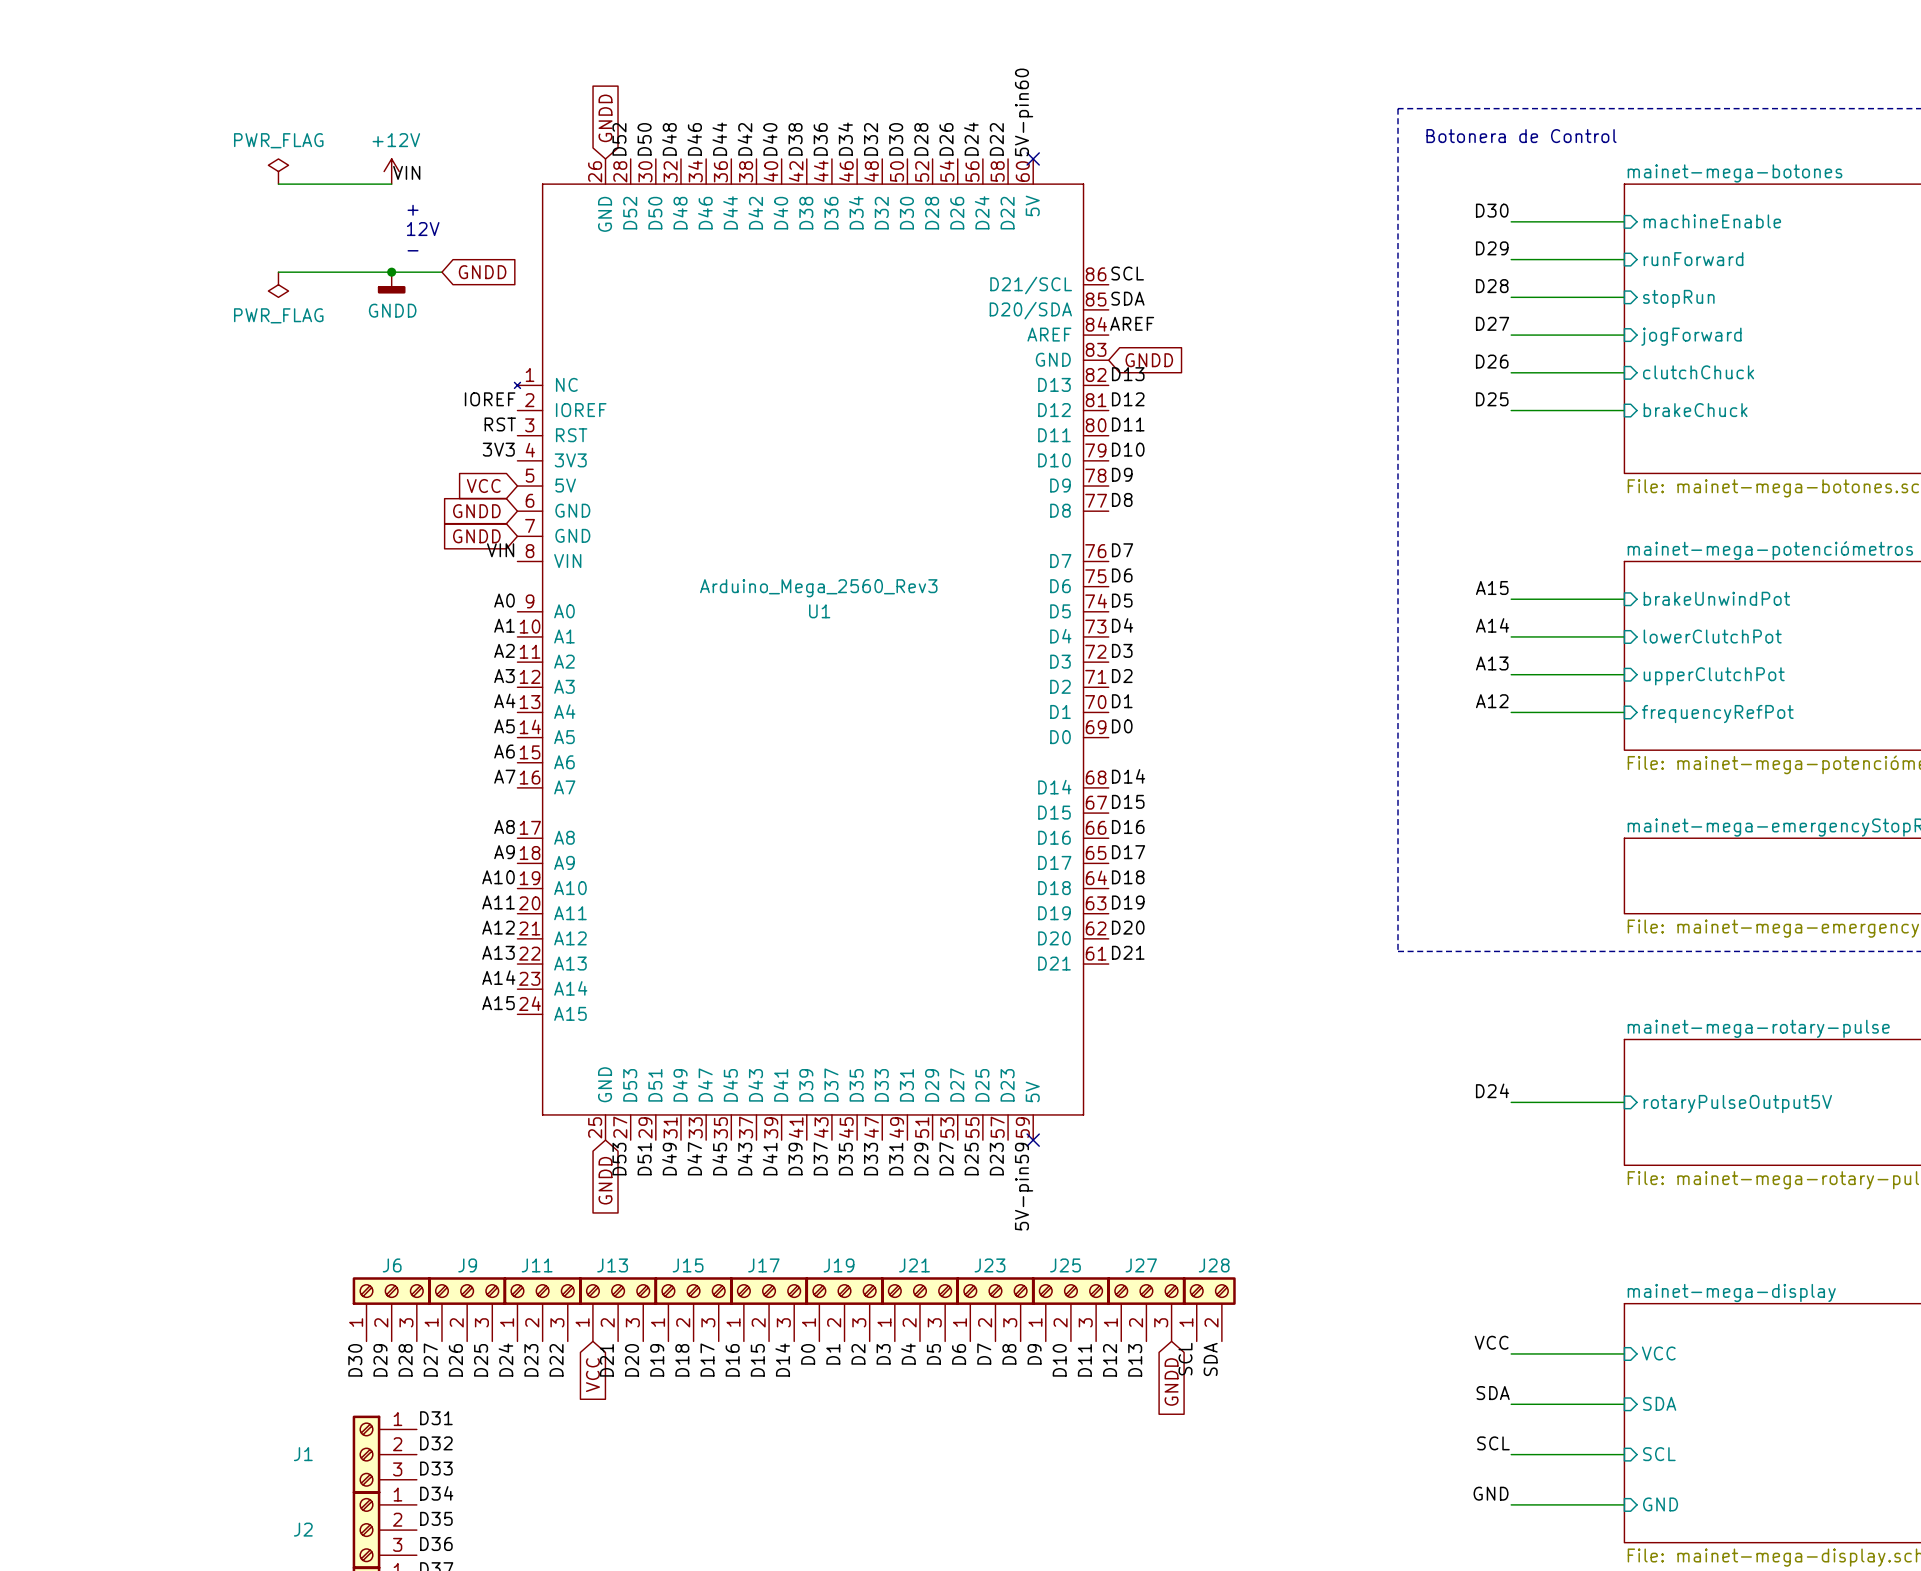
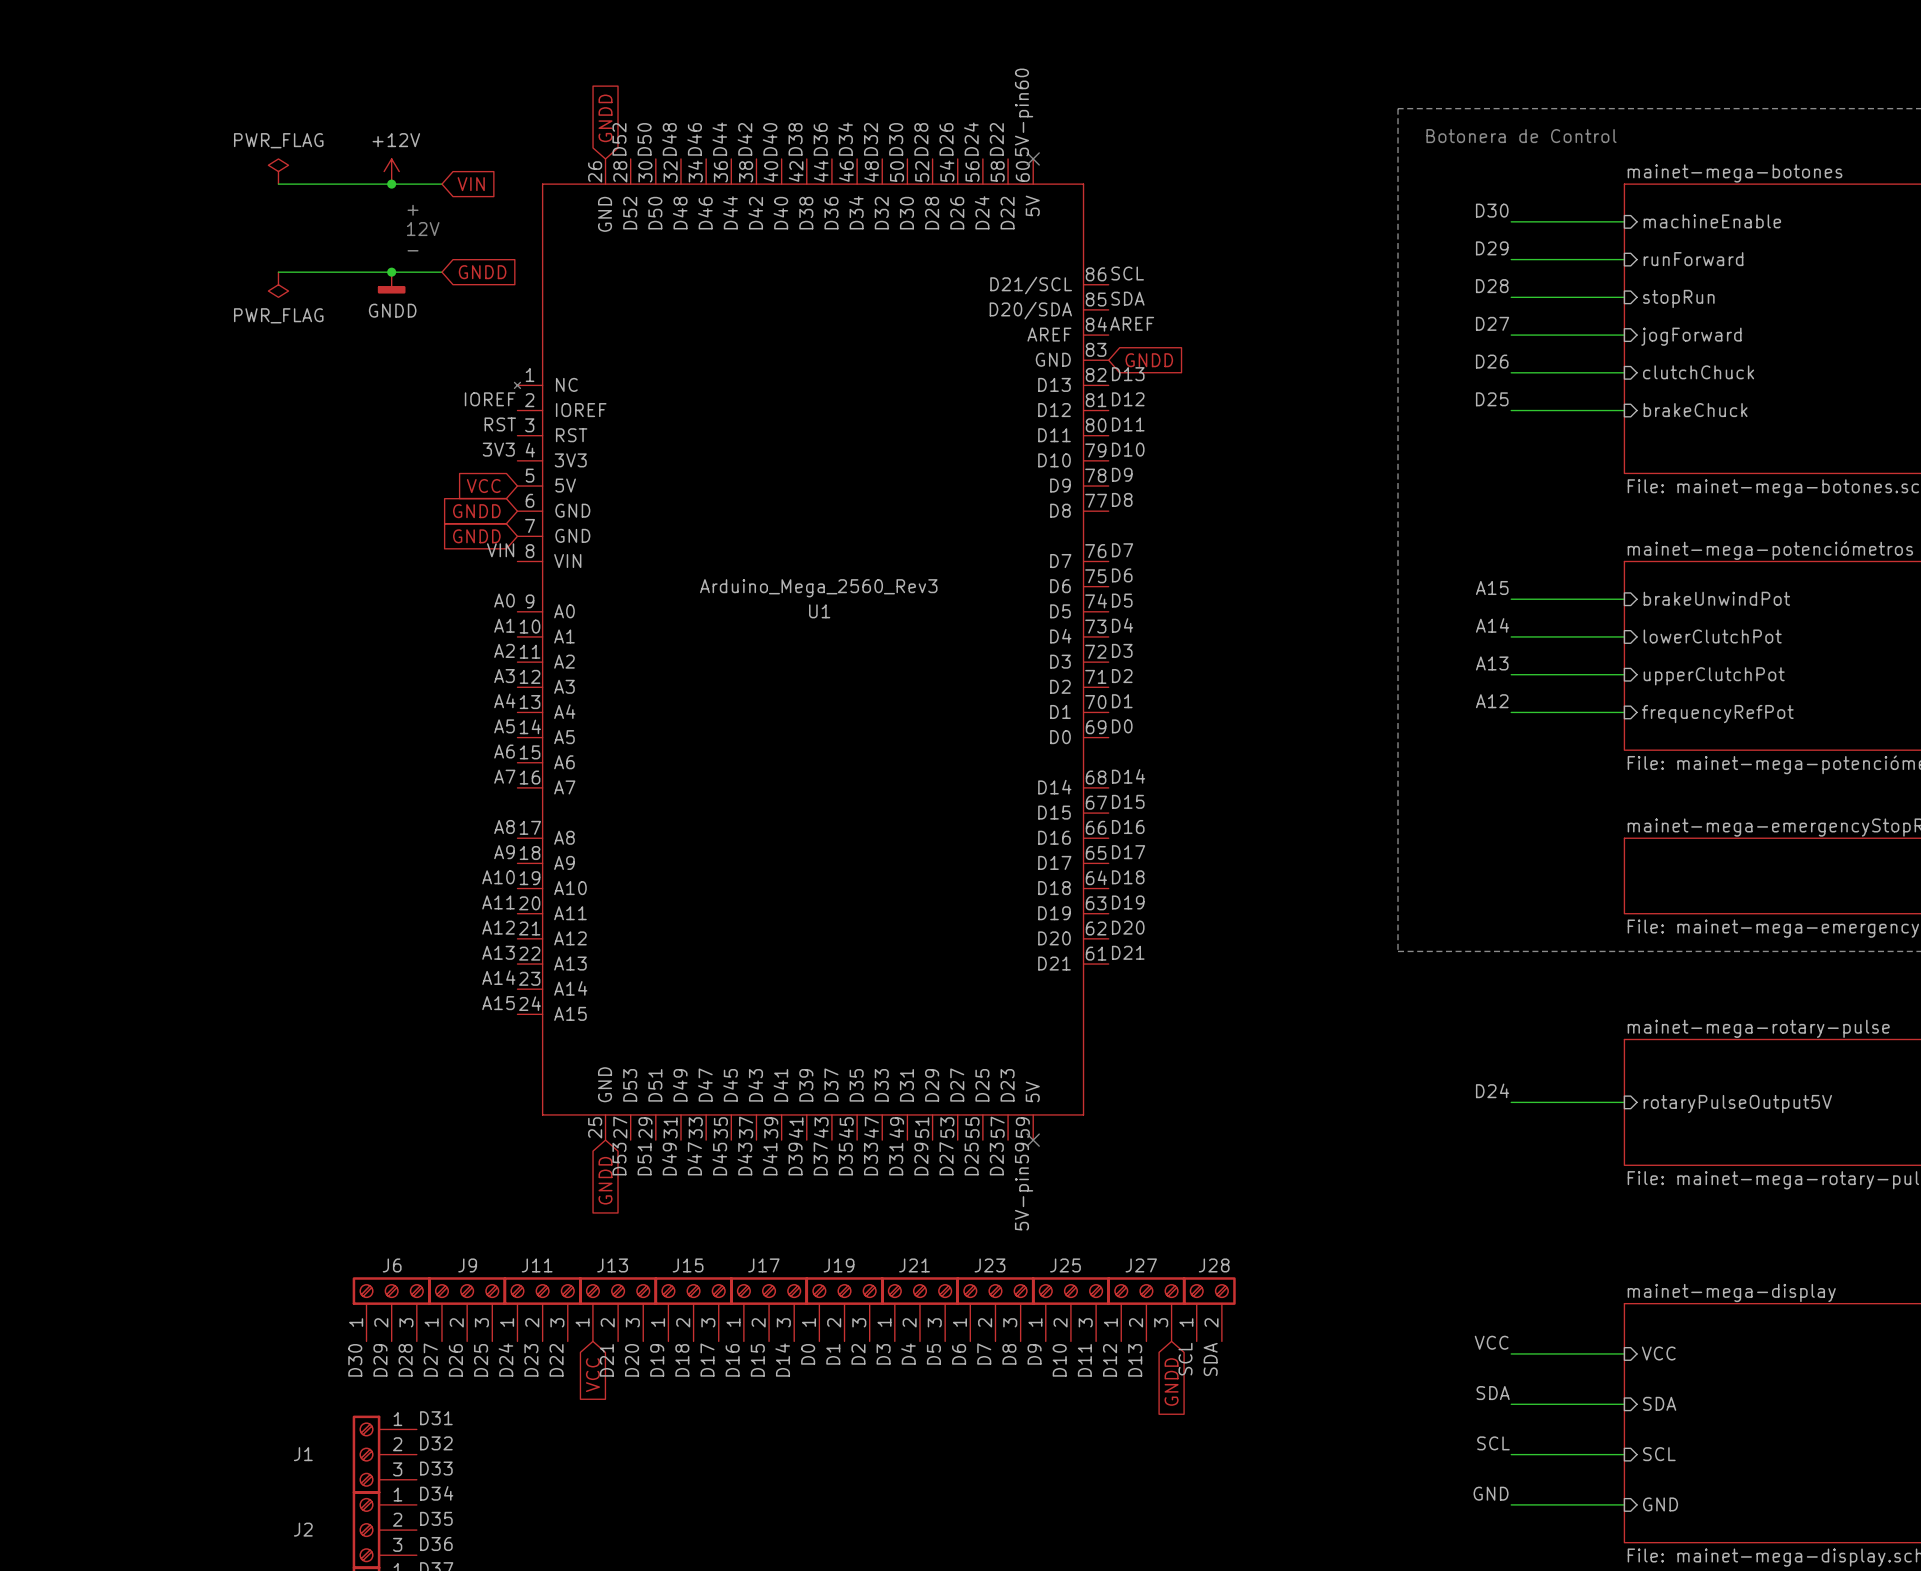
label: VIN (406, 172) -> none
wire: none -> (391, 184) (441, 184)
junction: none -> (391, 184)
global label: none -> VIN (471, 184)

